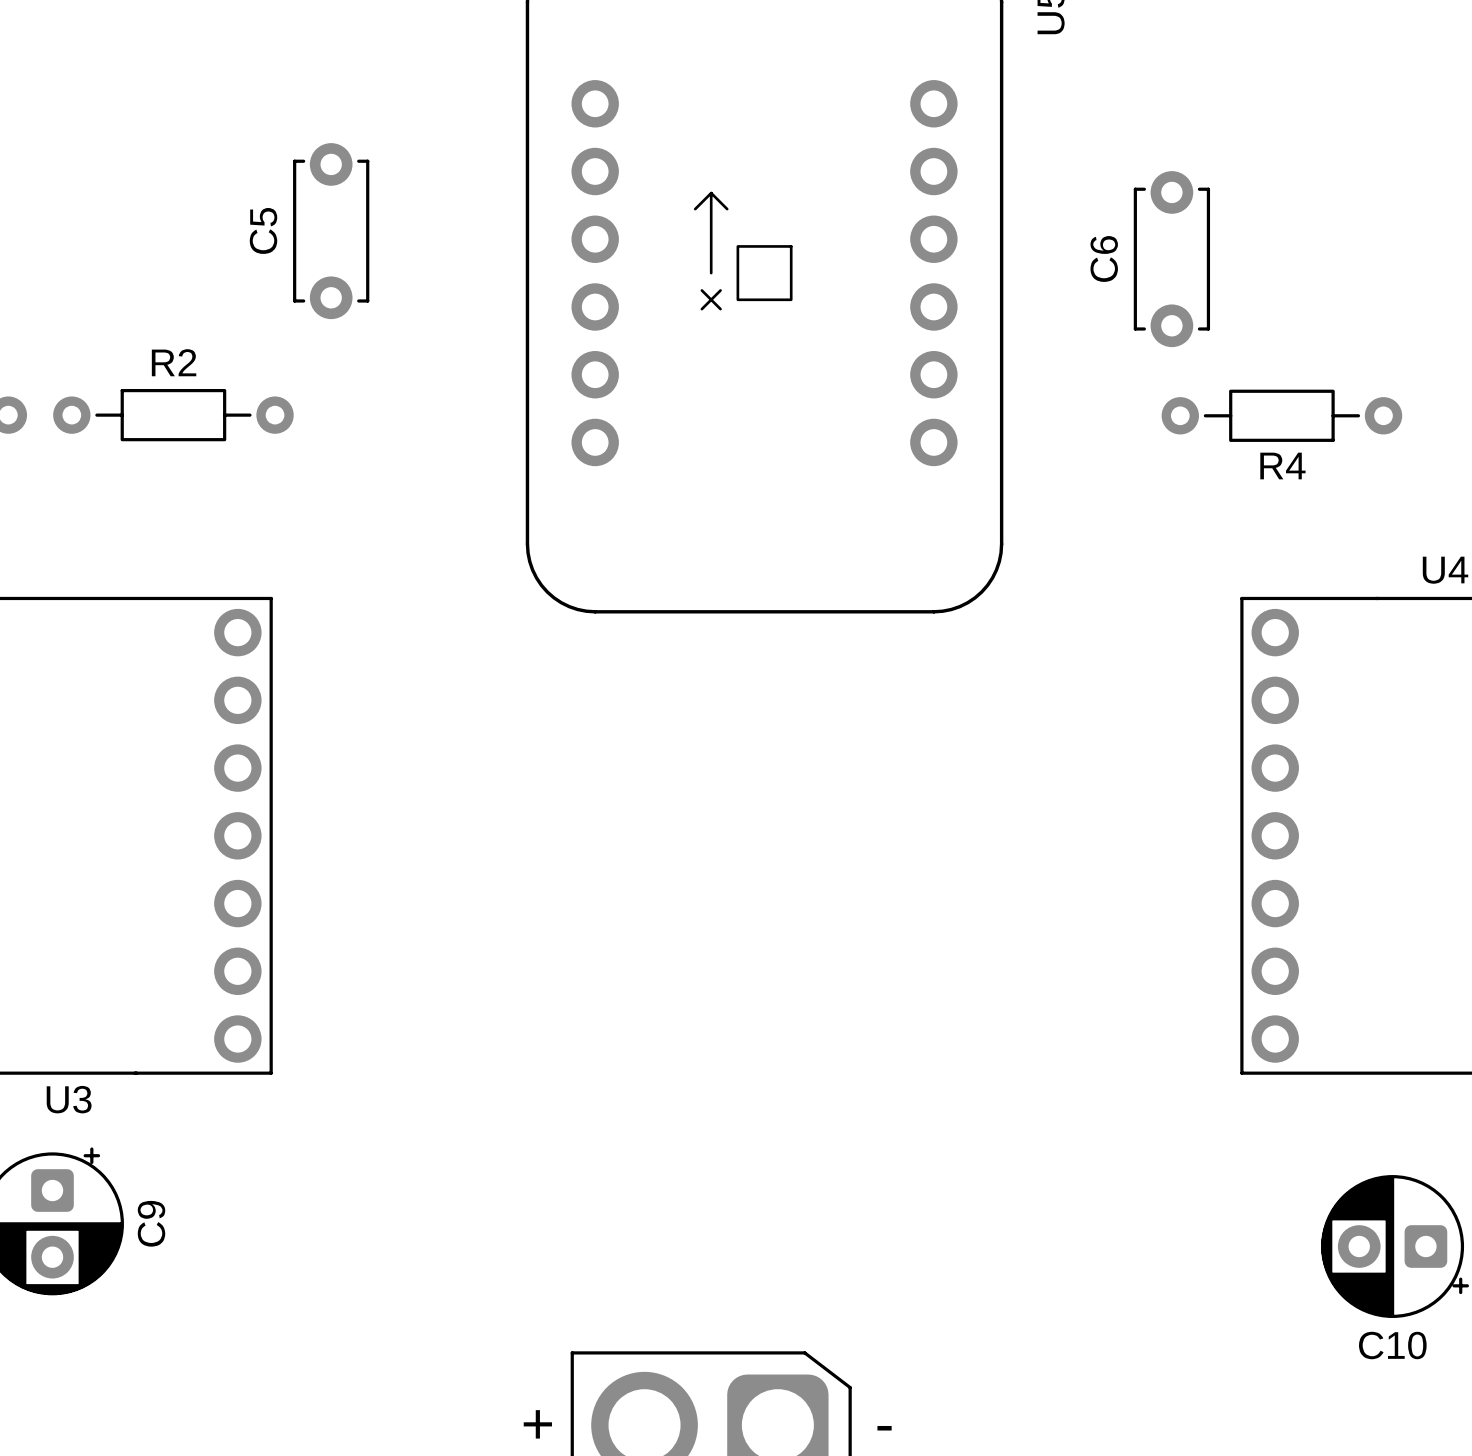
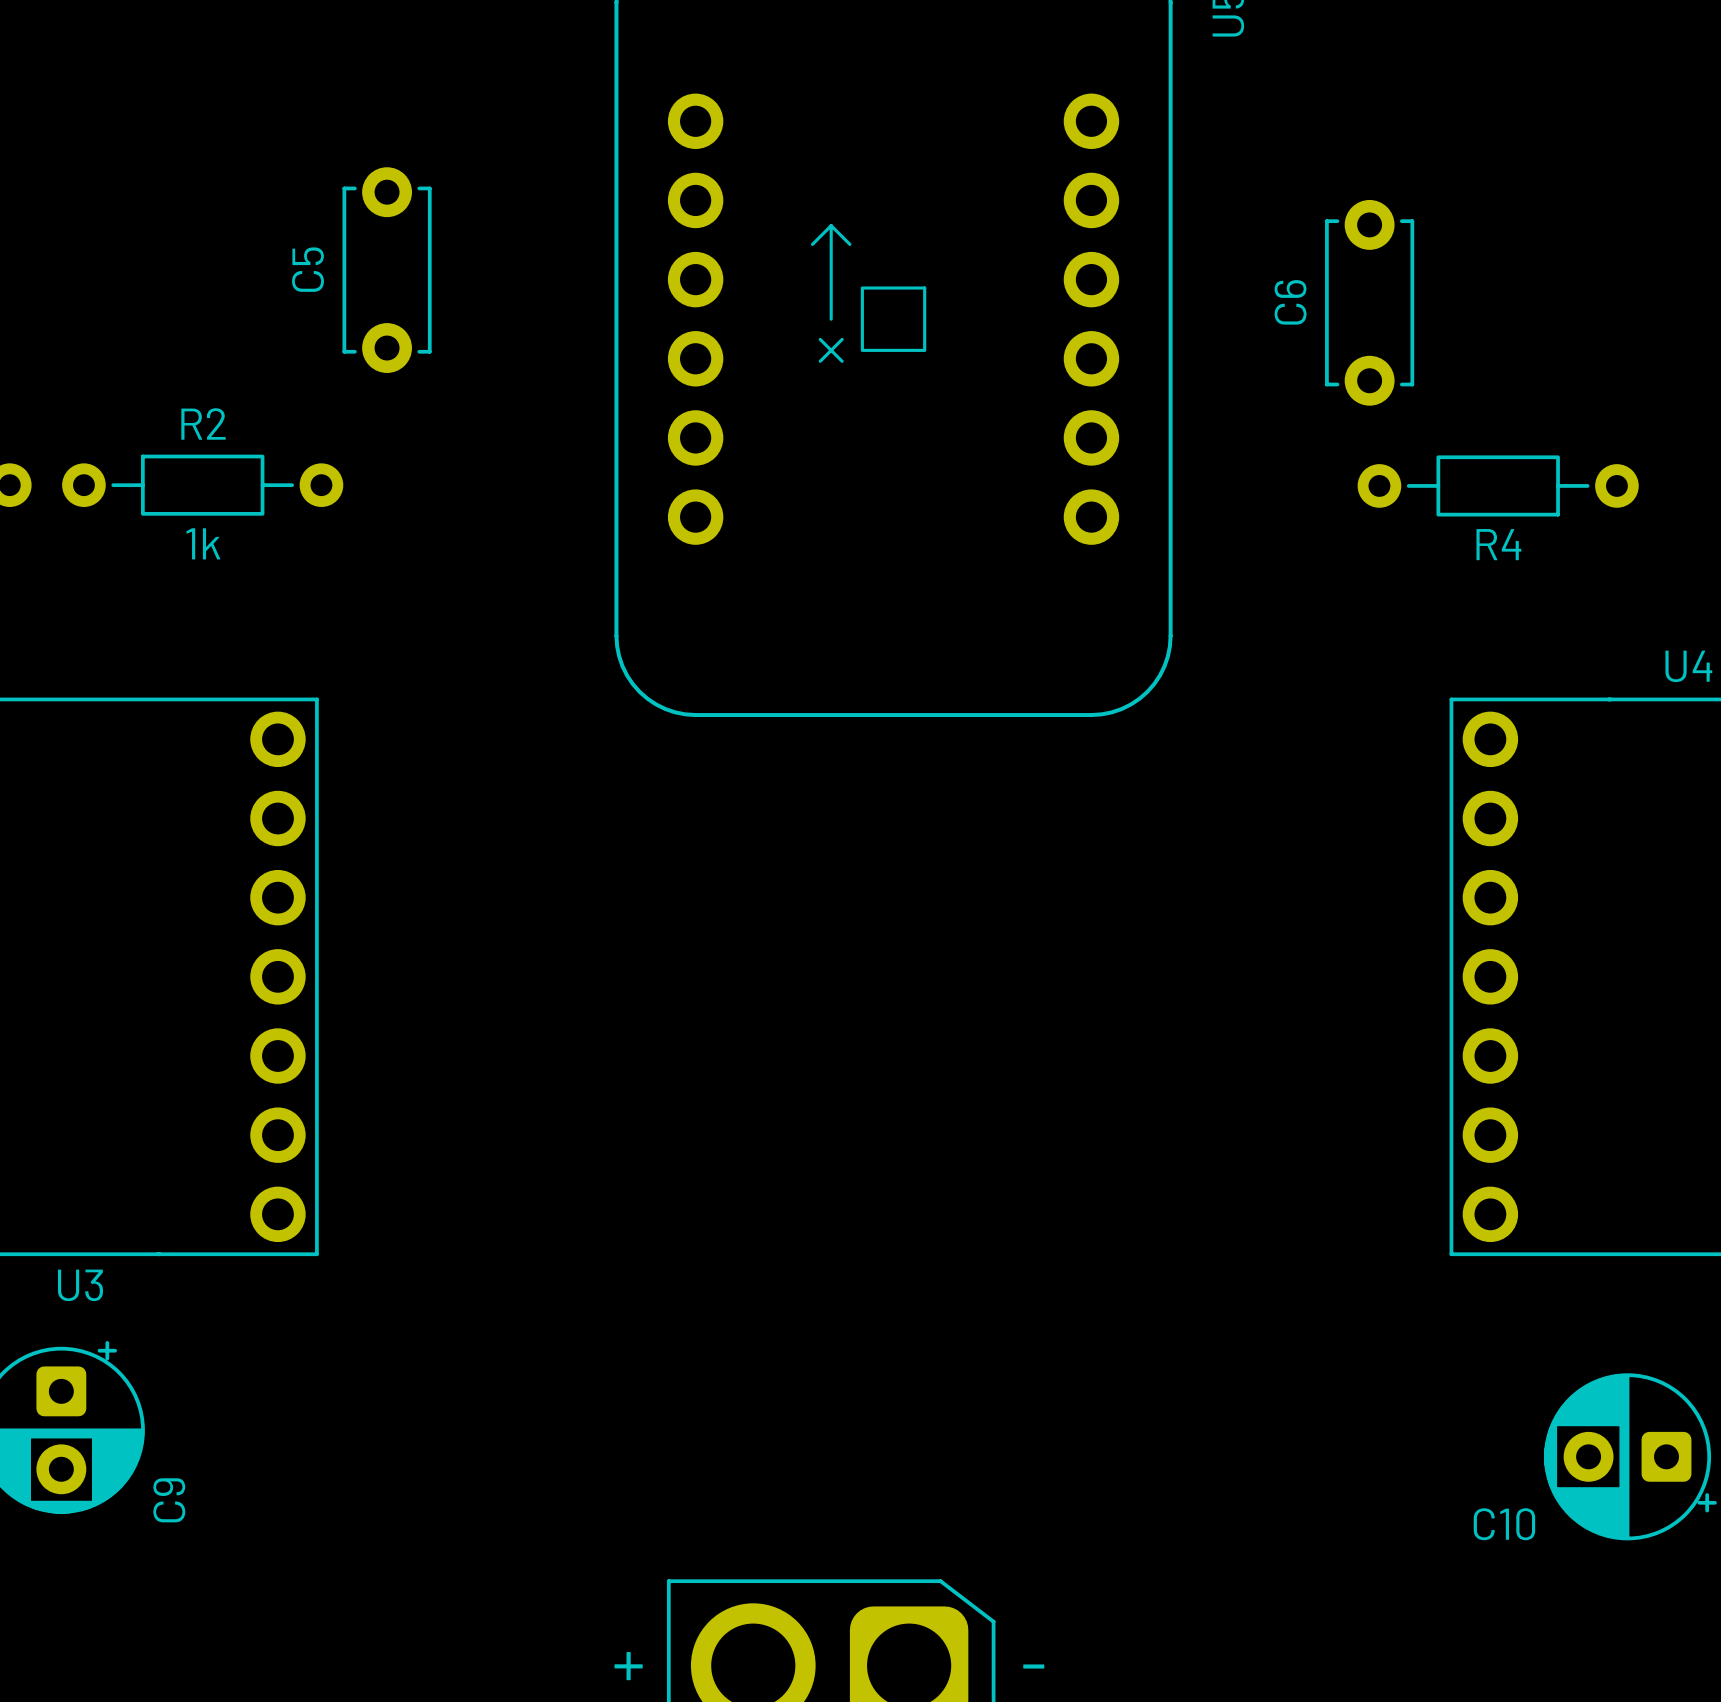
R2 value: none -> 1k (203, 543)
C9 name position: C9 (151, 1223) -> C9 (169, 1500)
C10 name position: C10 (1392, 1345) -> C10 (1504, 1524)

